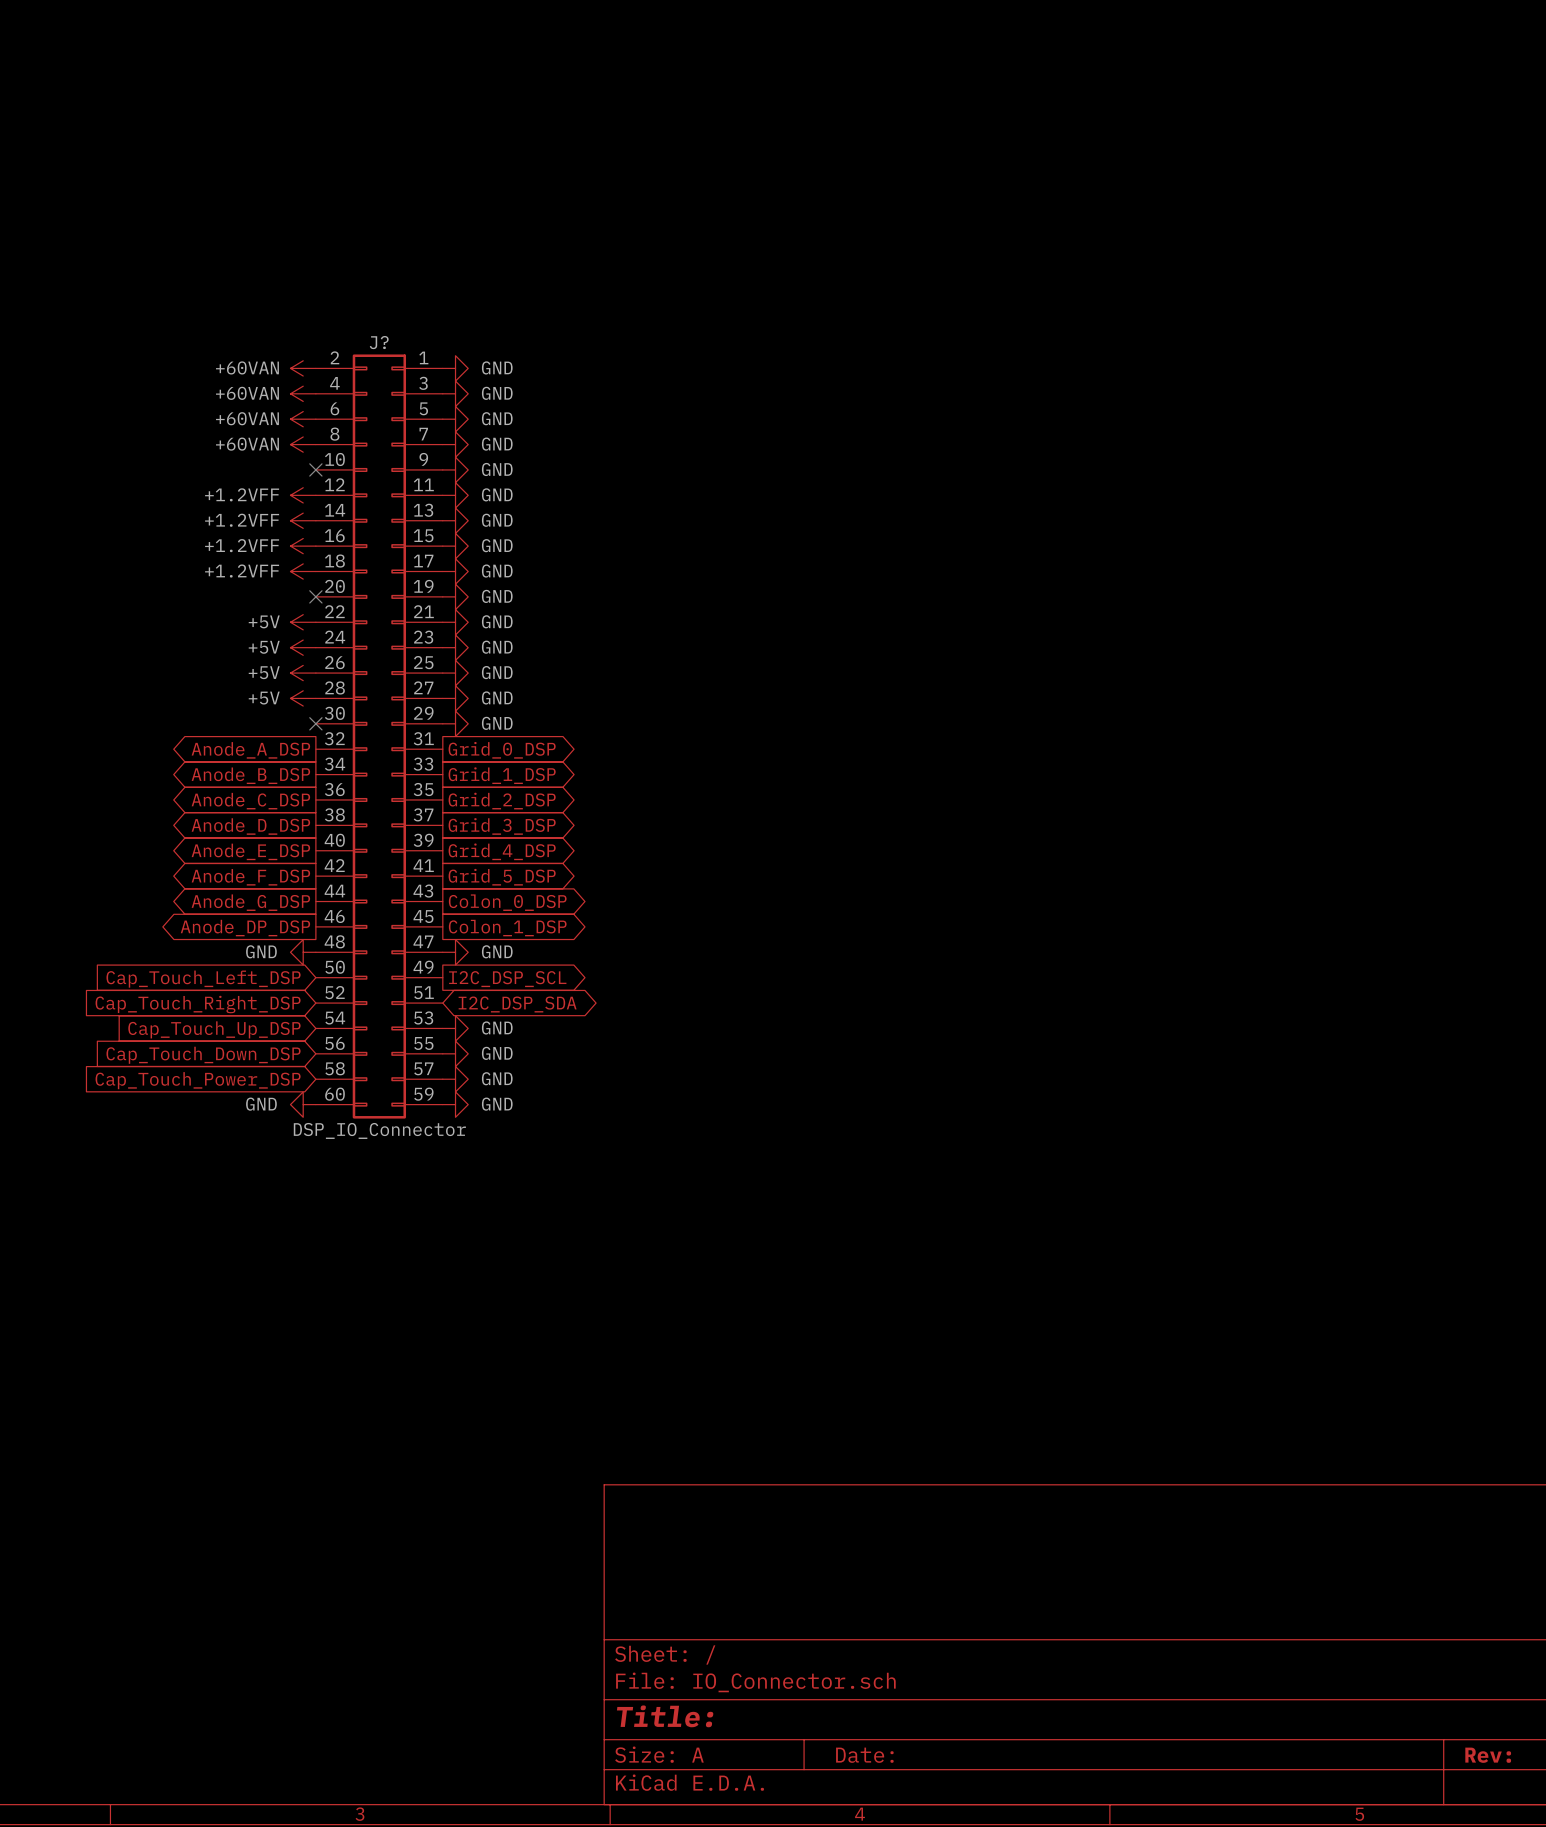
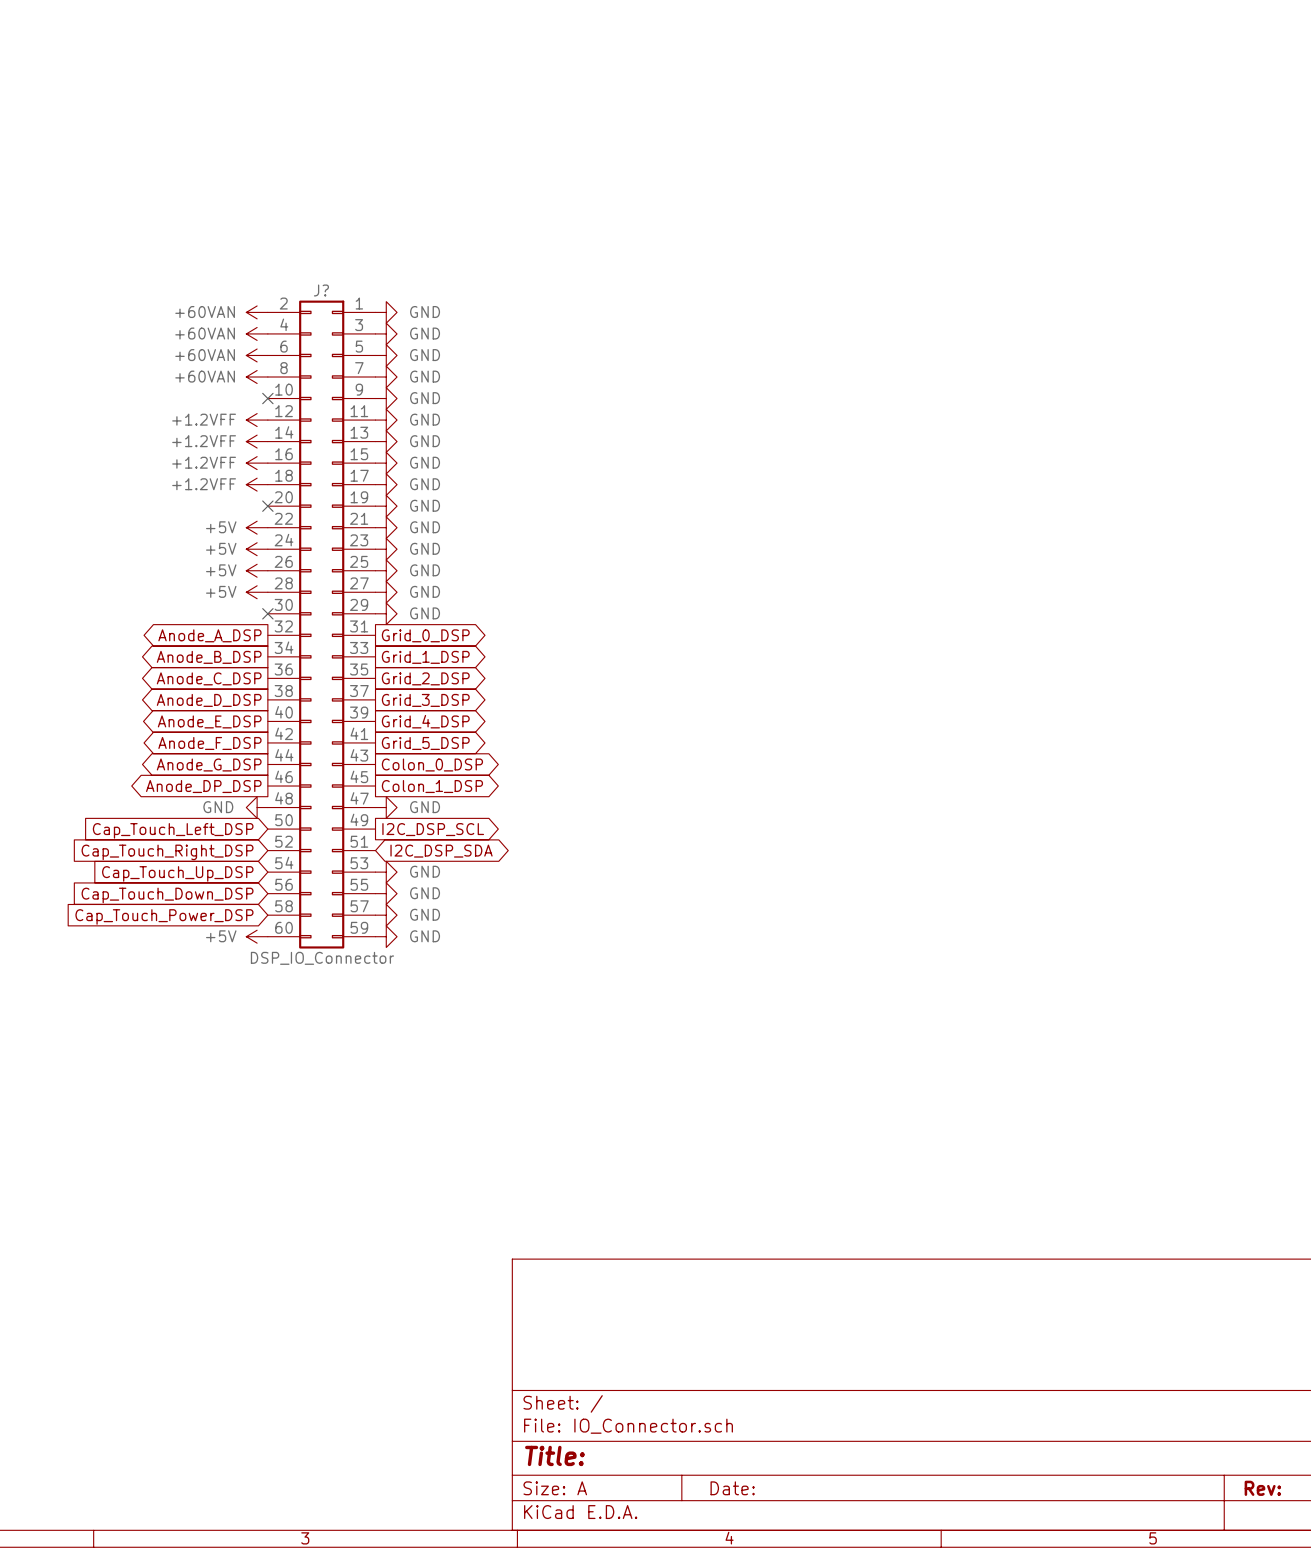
power symbol: GND (303, 1104) -> +5V (257, 936)

